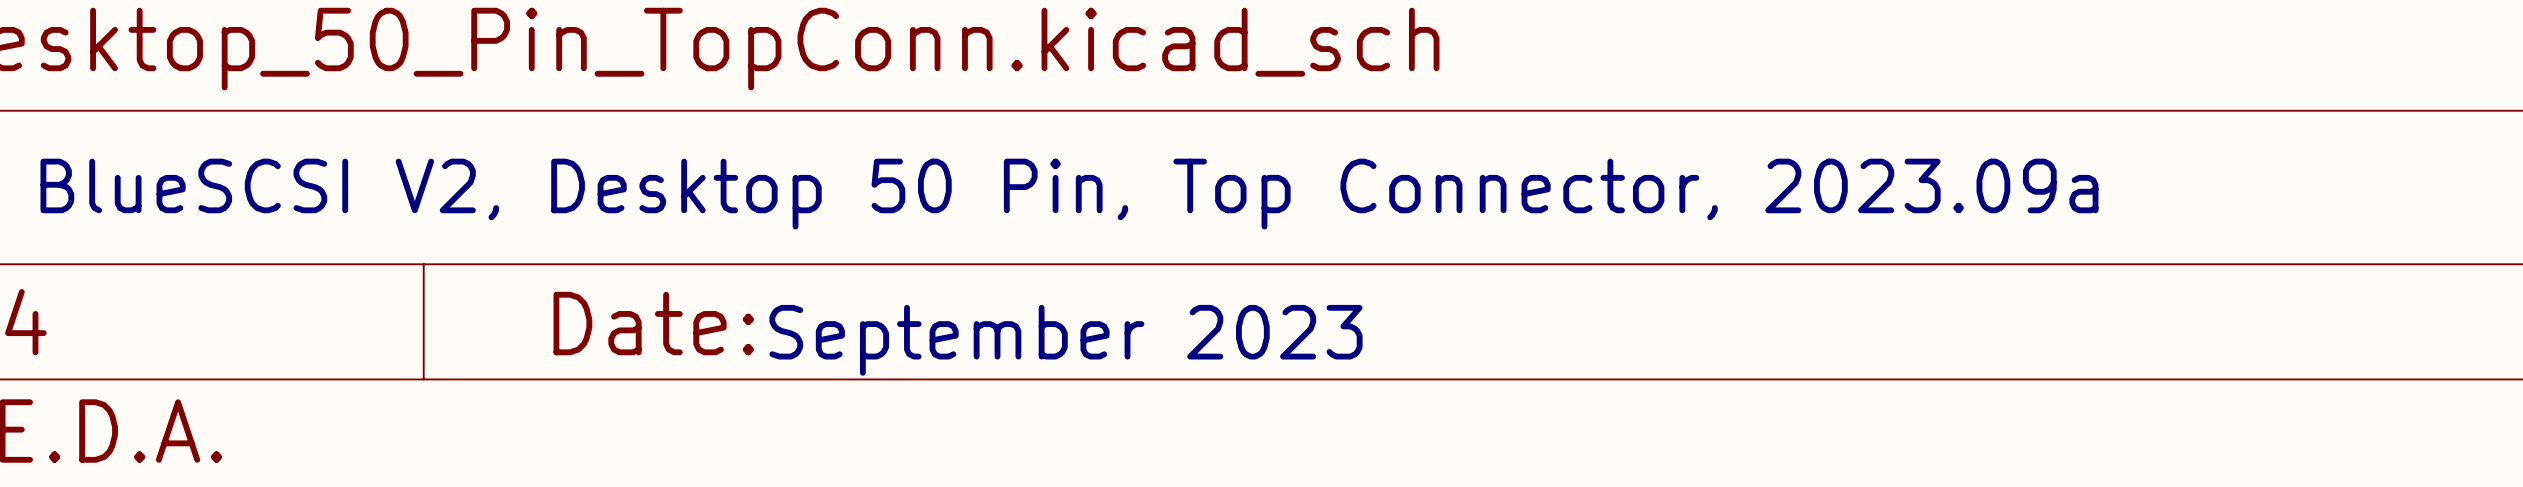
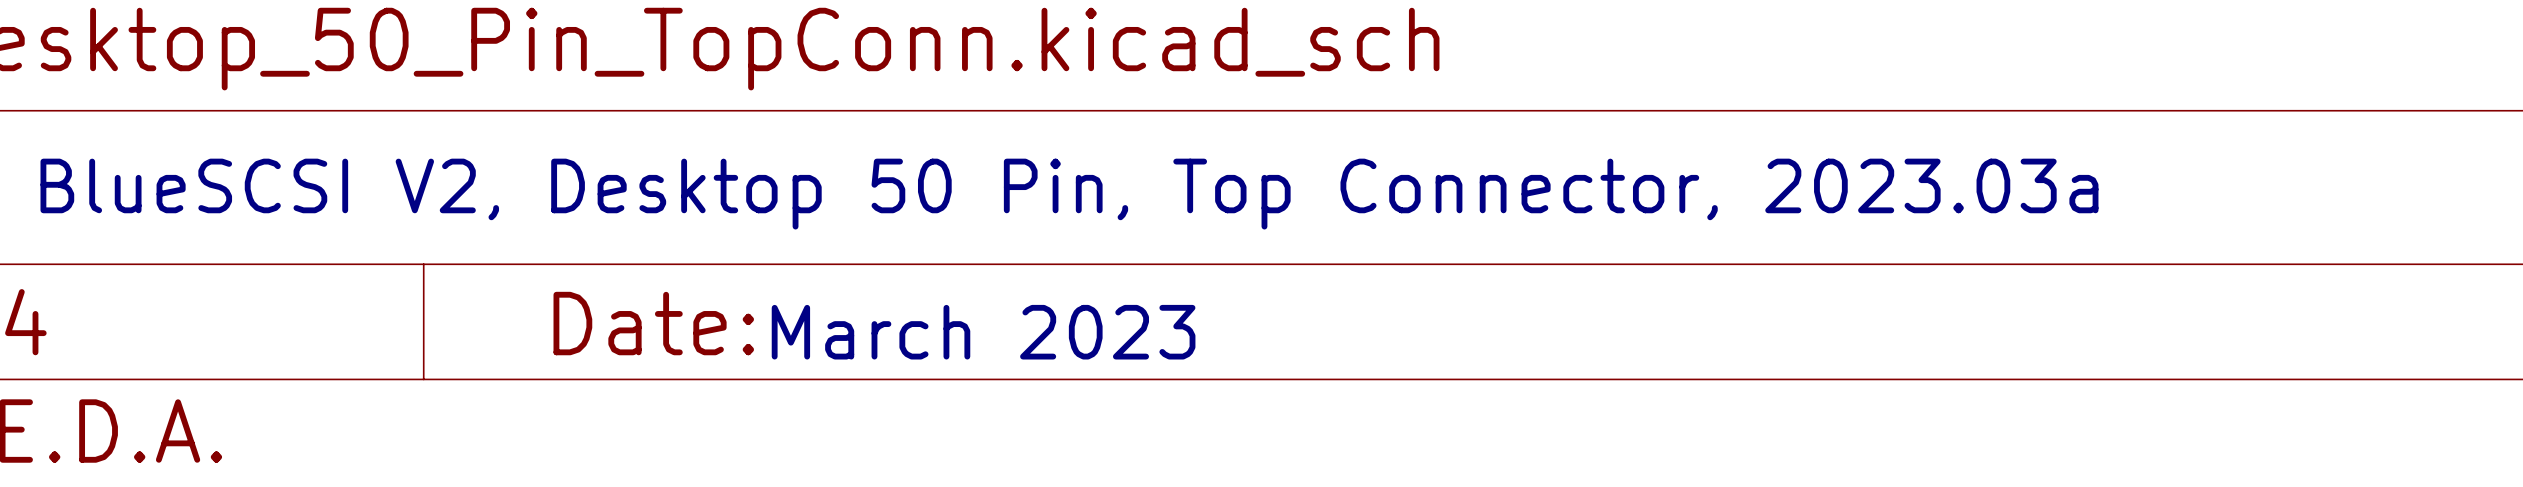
text: BlueSCSI V2, Desktop 50 Pin, Top Connector, 2023.09a (1069, 194) -> BlueSCSI V2, Desktop 50 Pin, Top Connector, 2023.03a (1069, 194)
text: September 2023 (1065, 340) -> March 2023 (983, 332)

